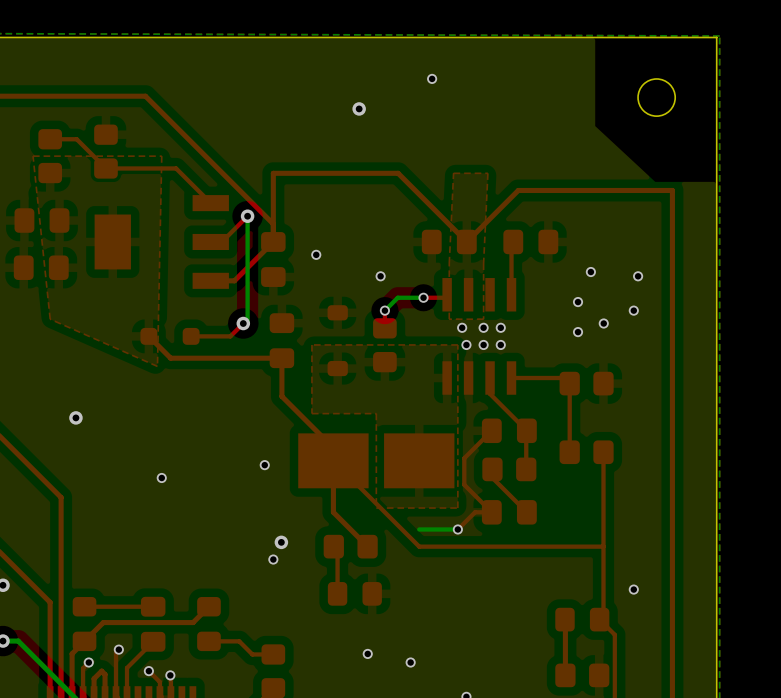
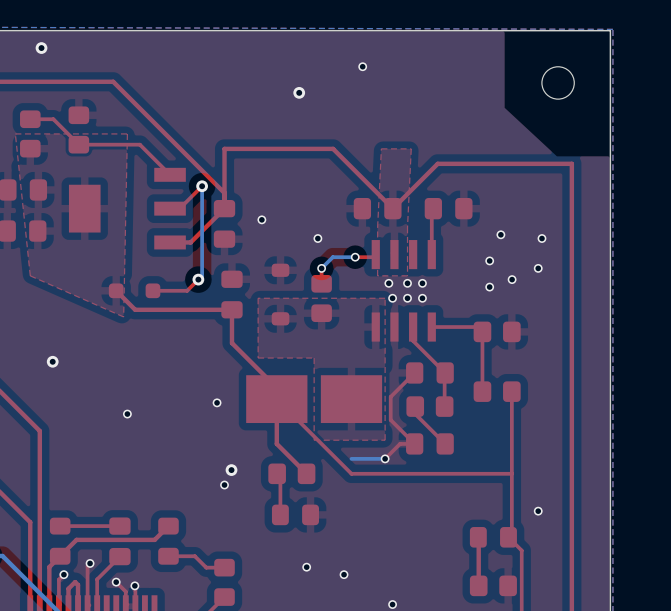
via: none -> (41, 48)

